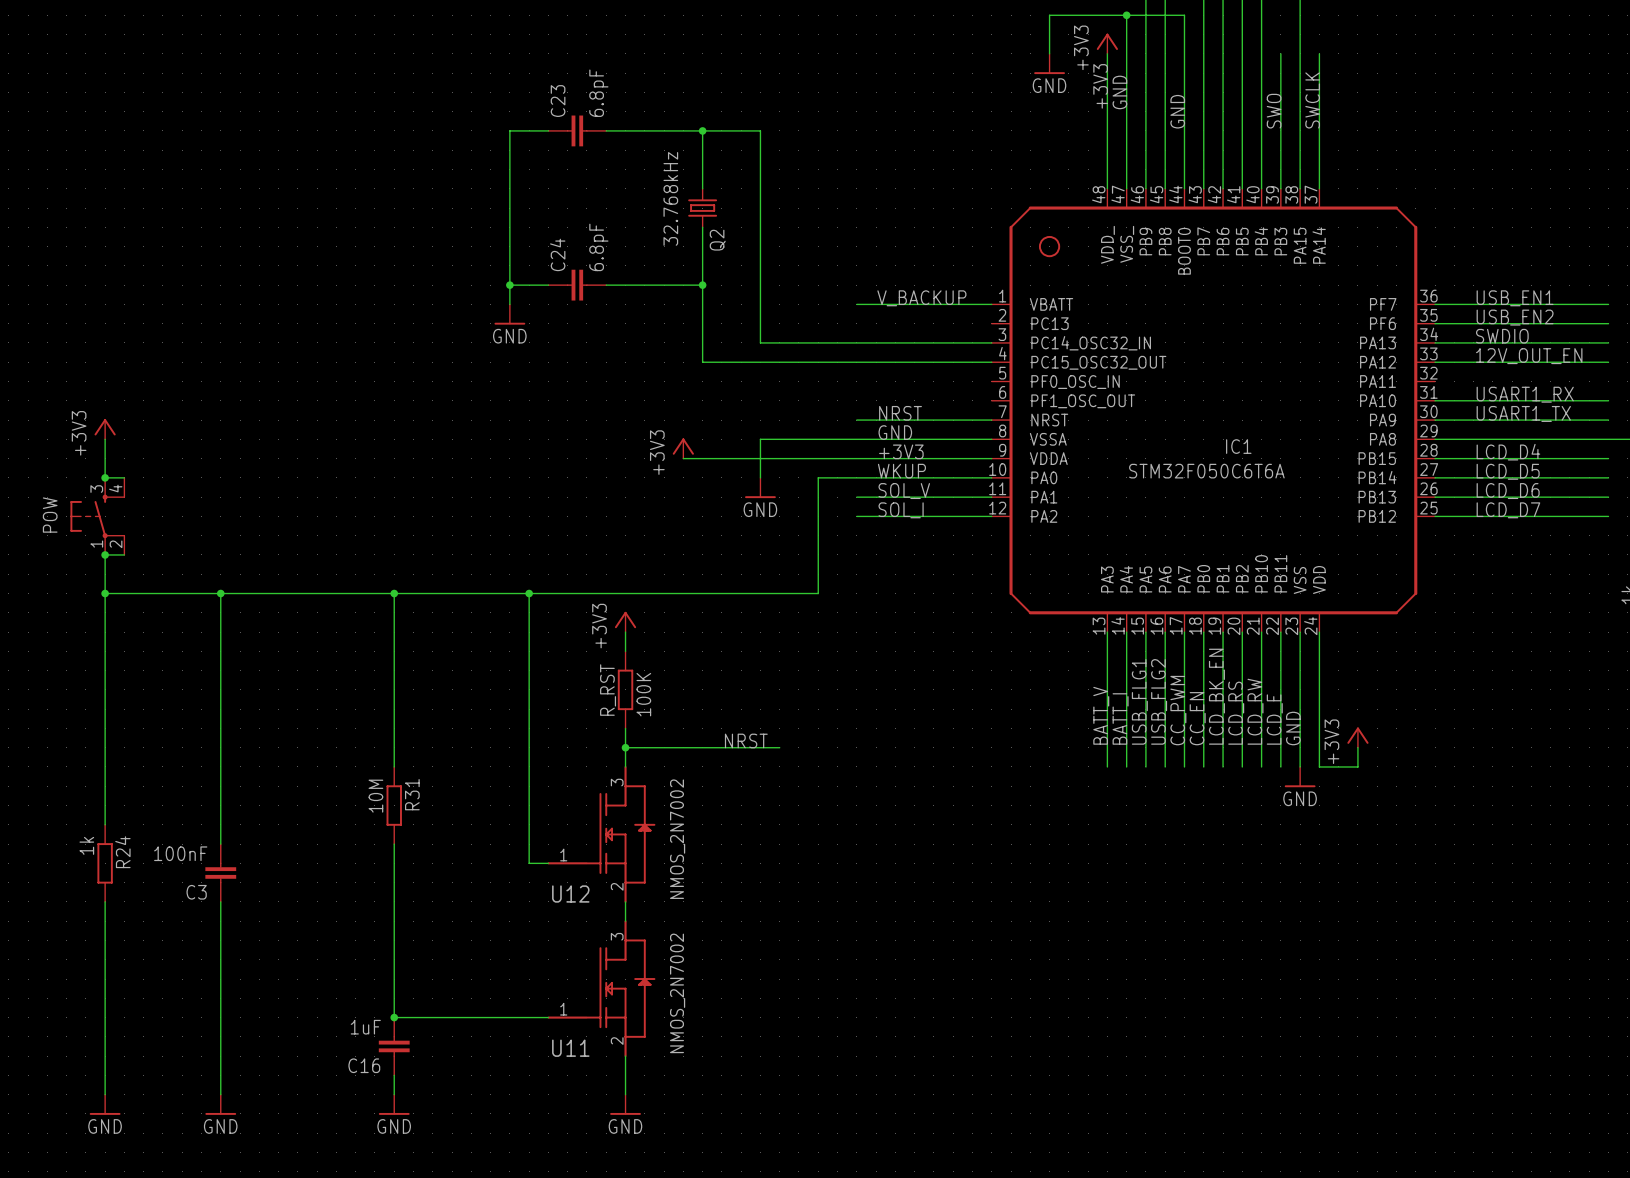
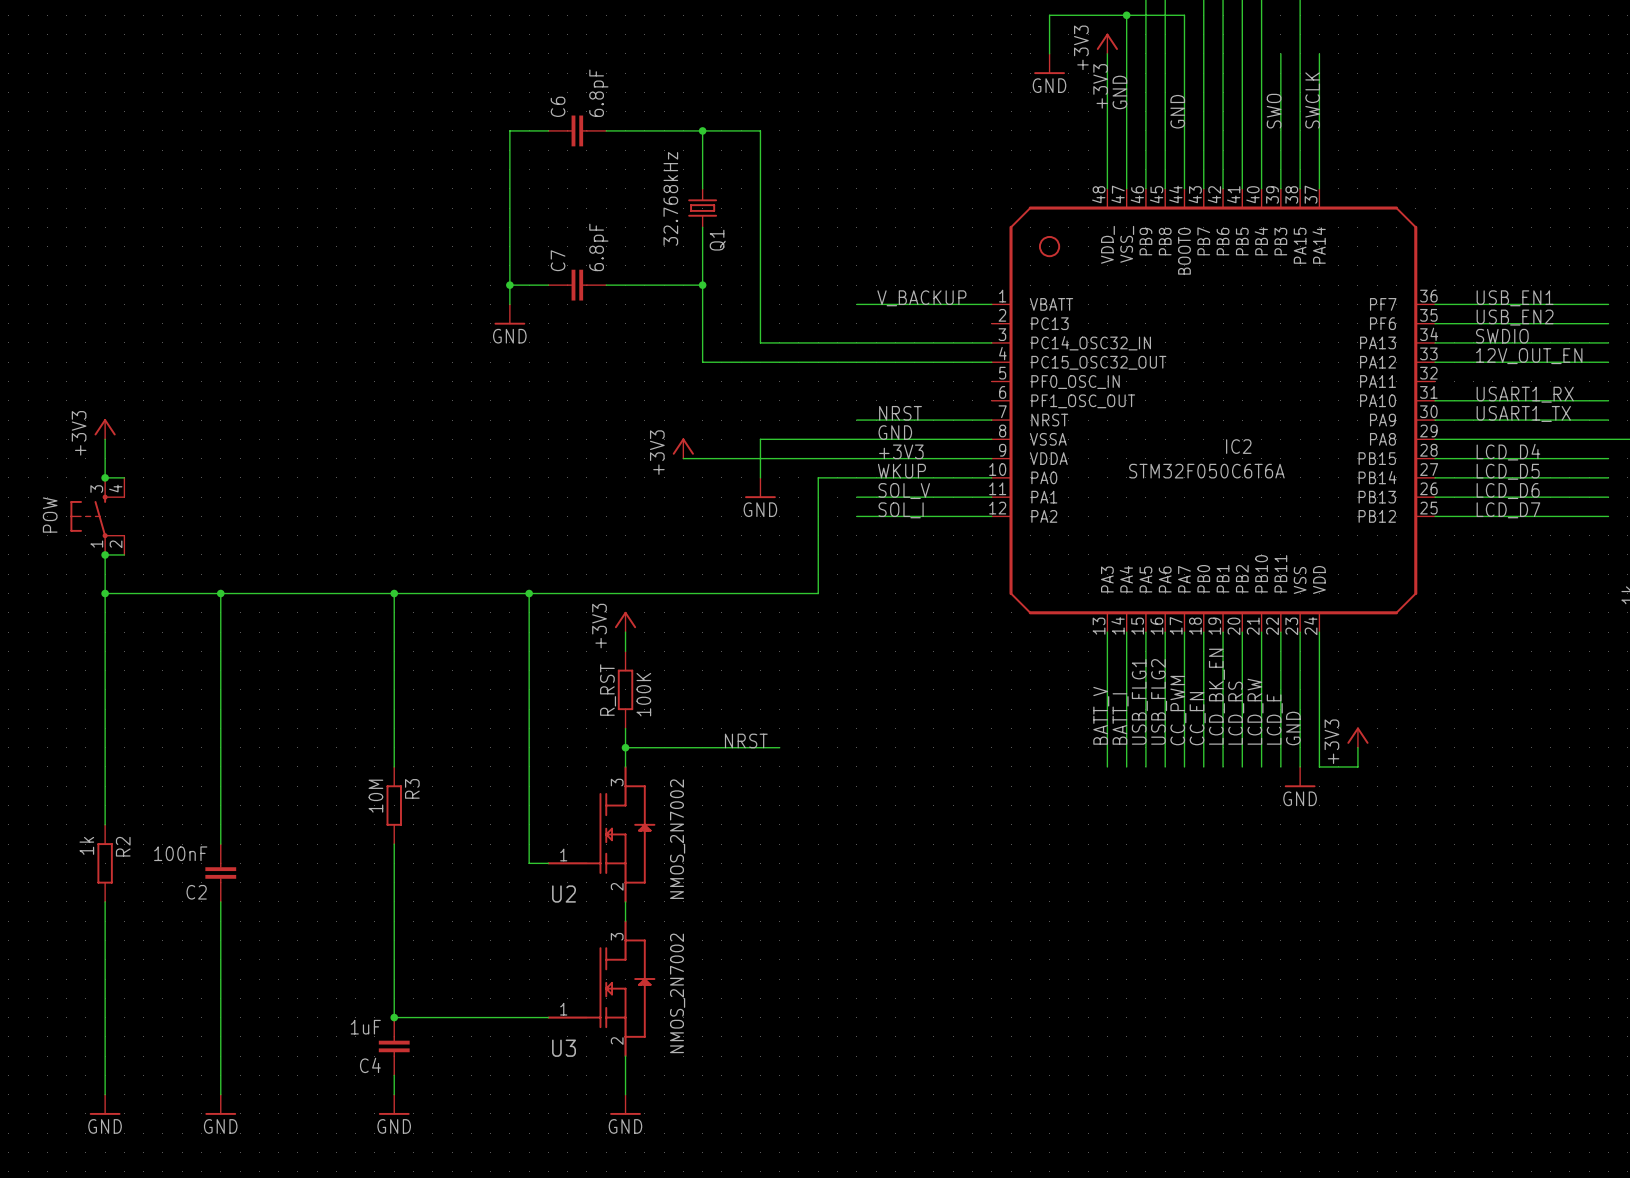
C23 name: C23 (558, 101) -> C6 (558, 106)
Q2 name: Q2 (717, 240) -> Q1 (717, 240)
C24 name: C24 (557, 254) -> C7 (558, 260)
IC1 name: IC1 (1238, 446) -> IC2 (1238, 446)
R31 name: R31 (412, 794) -> R3 (412, 788)
R24 name: R24 (122, 852) -> R2 (123, 846)
C3 name: C3 (196, 892) -> C2 (196, 892)
U12 name: U12 (570, 894) -> U2 (564, 894)
U11 name: U11 (570, 1048) -> U3 (564, 1048)
C16 name: C16 (364, 1065) -> C4 (370, 1065)

